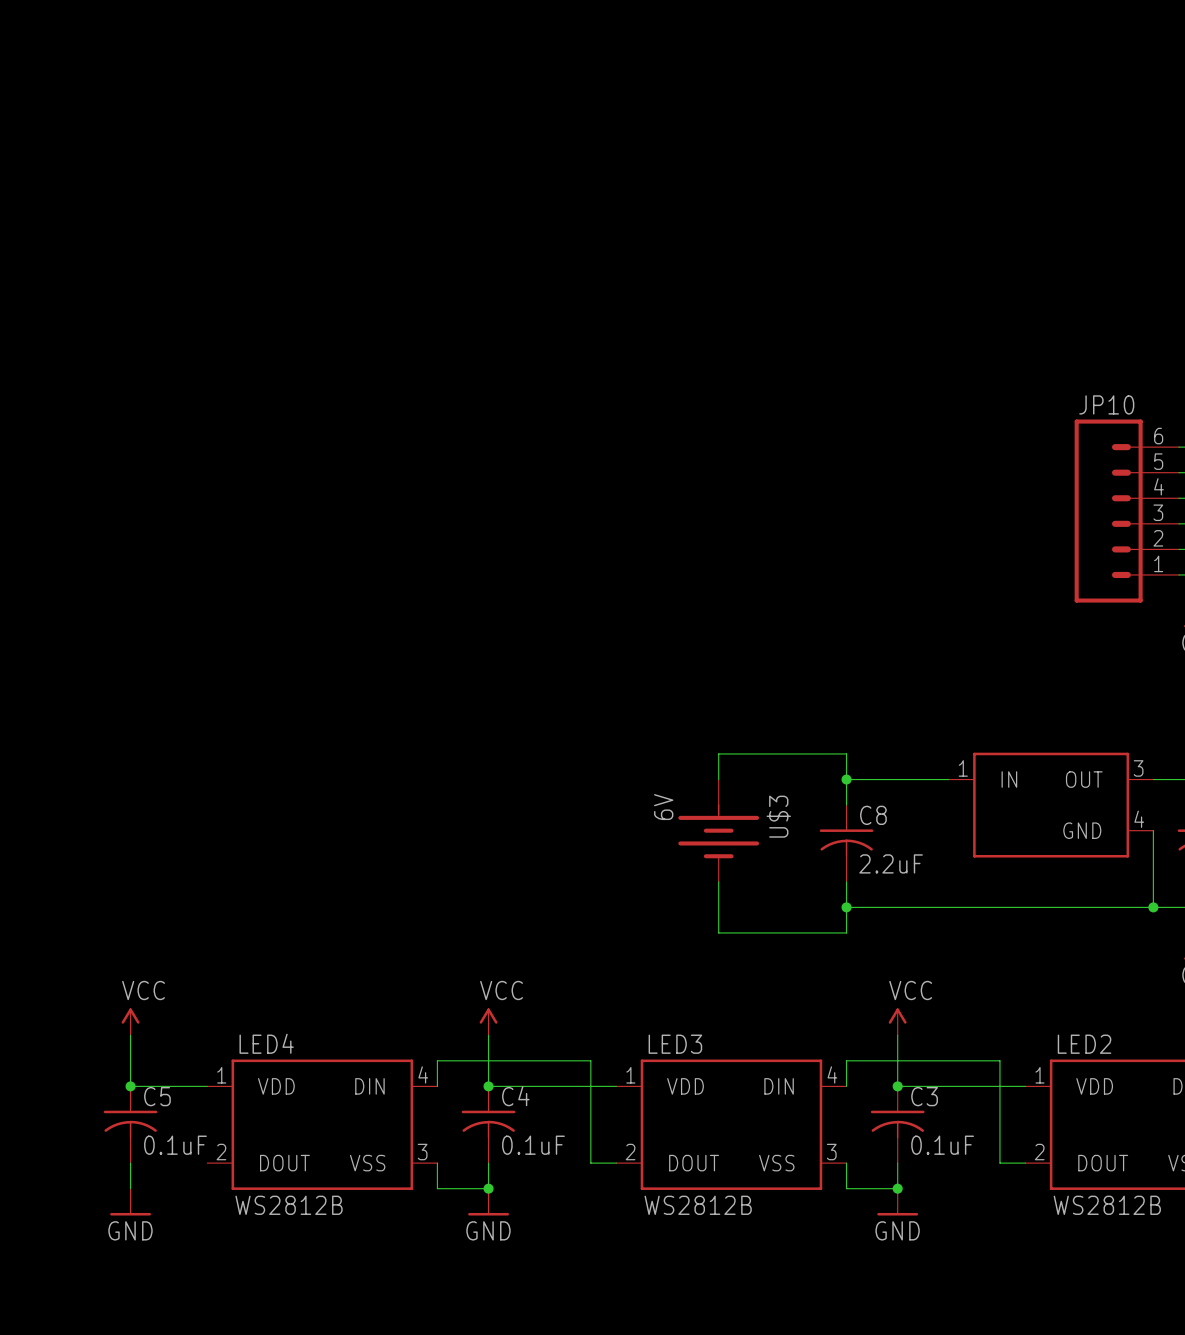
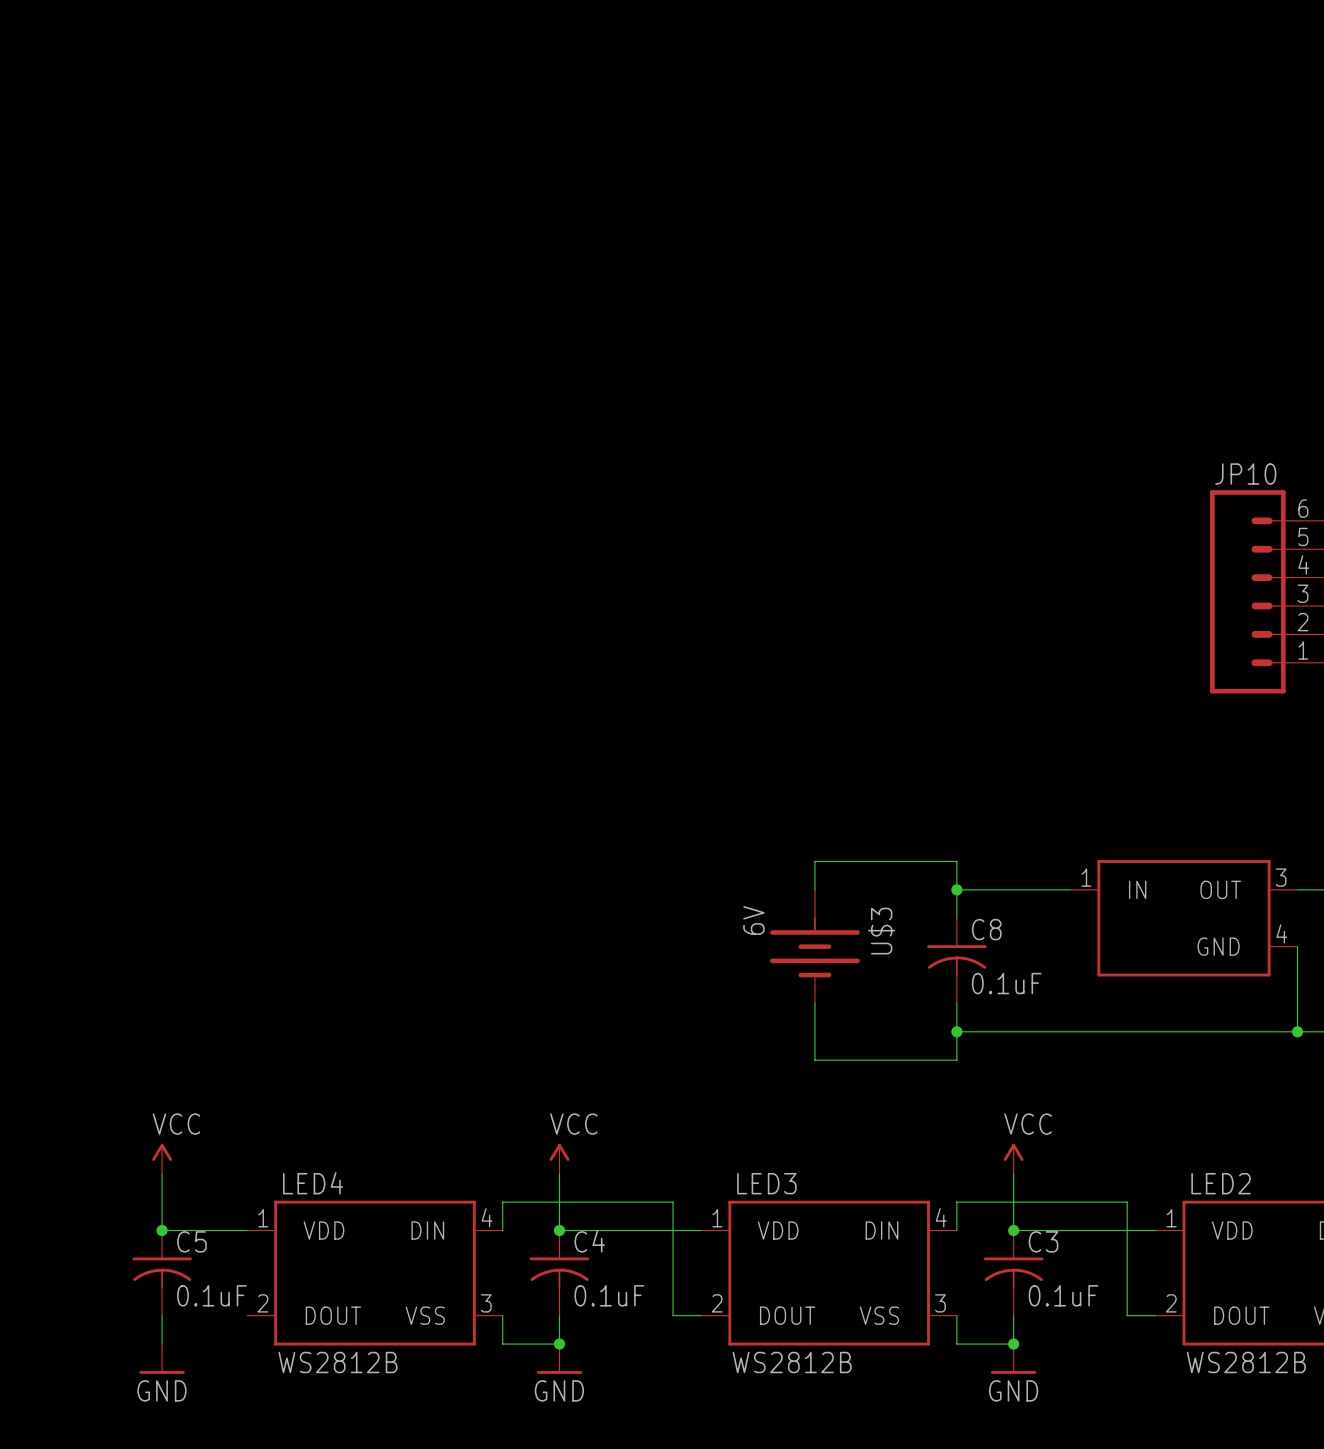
C8 value: 2.2uF (891, 863) -> 0.1uF (1006, 983)

